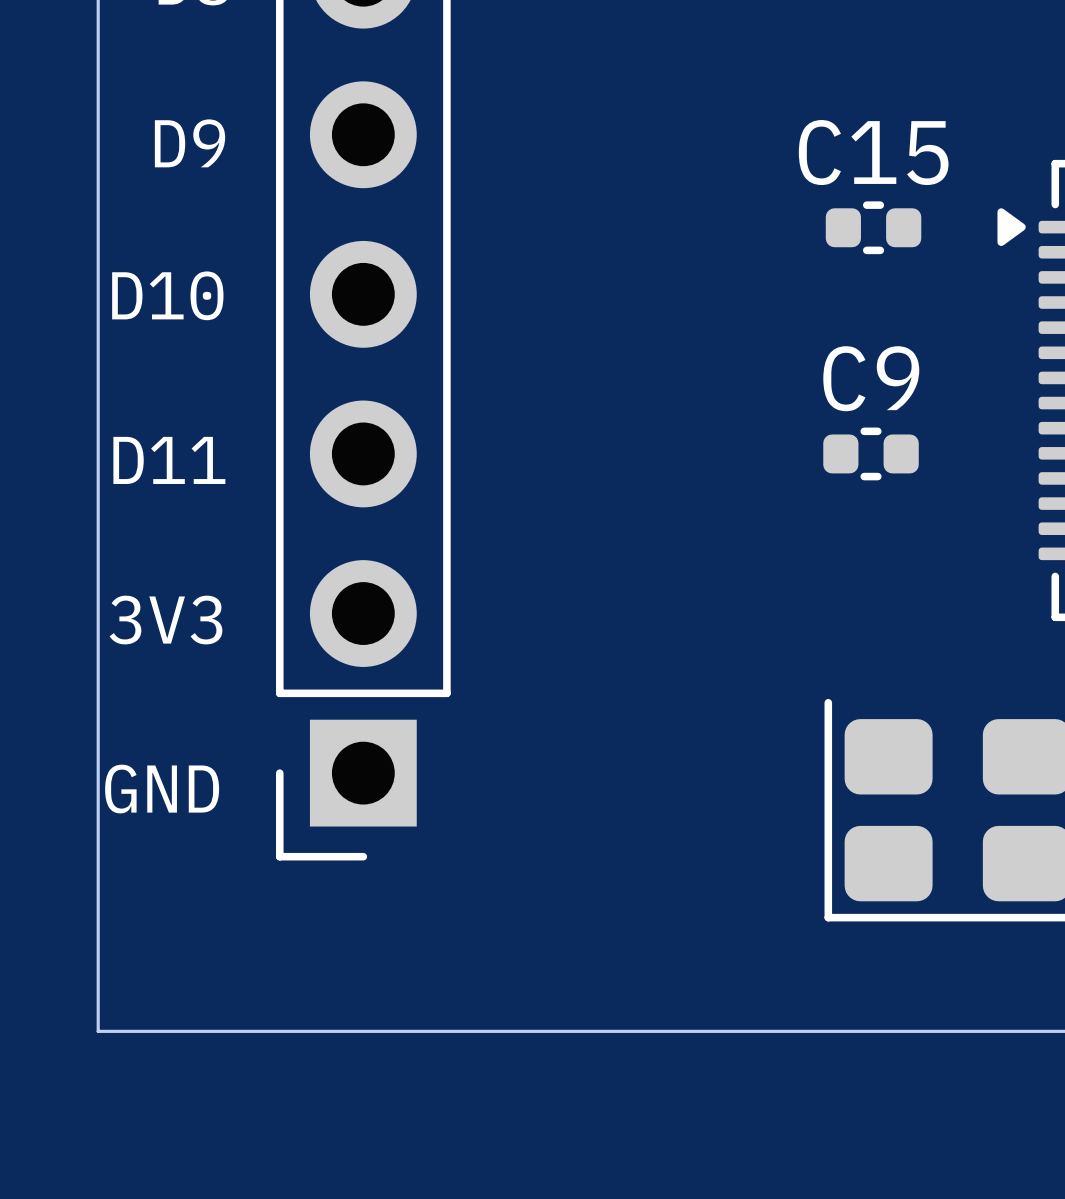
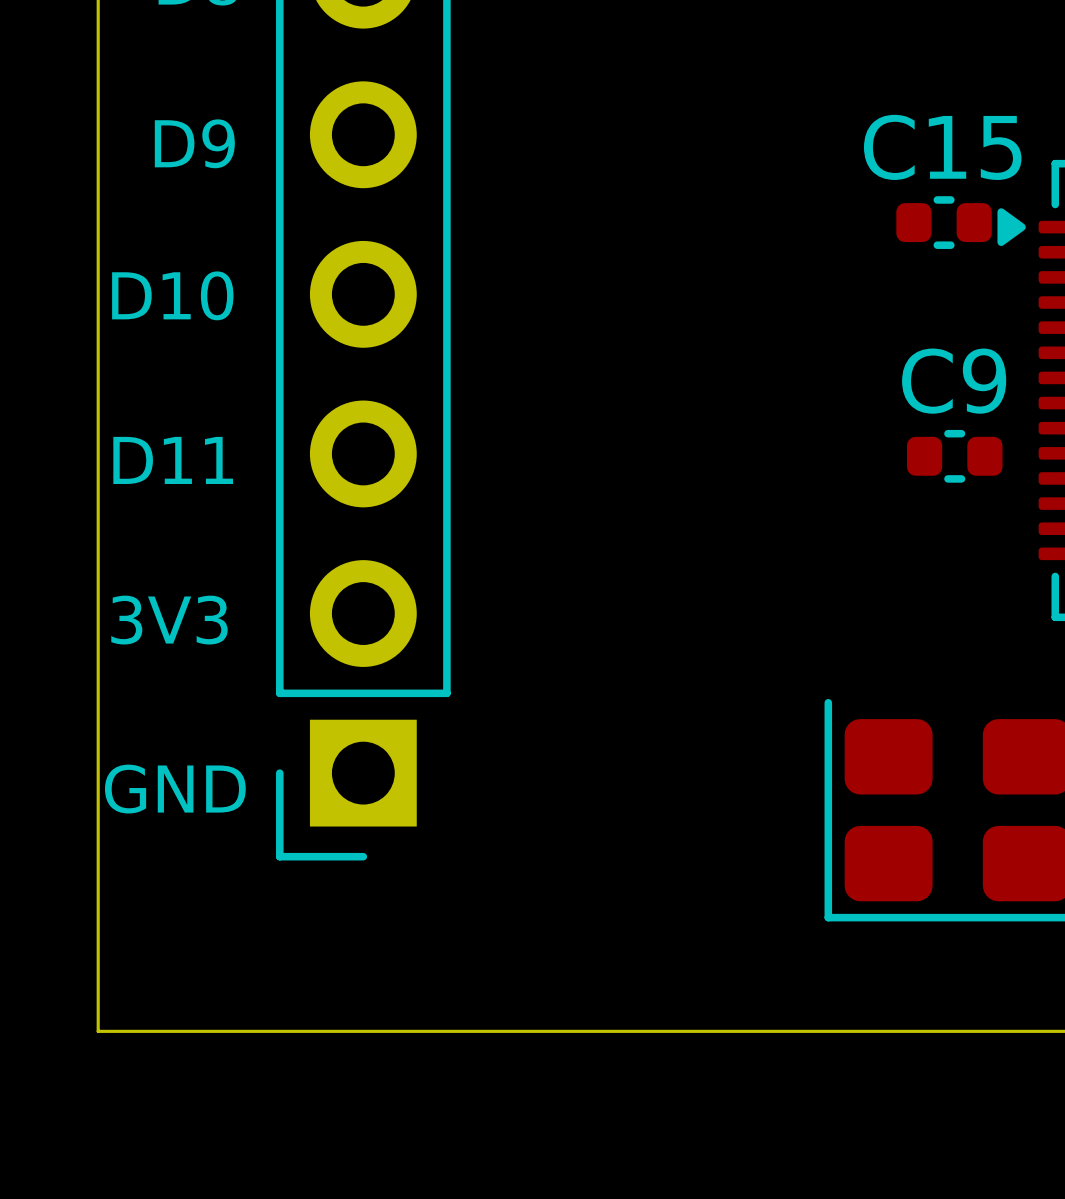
C15 position: (873, 227) -> (944, 222)
C9 position: (871, 453) -> (954, 456)

